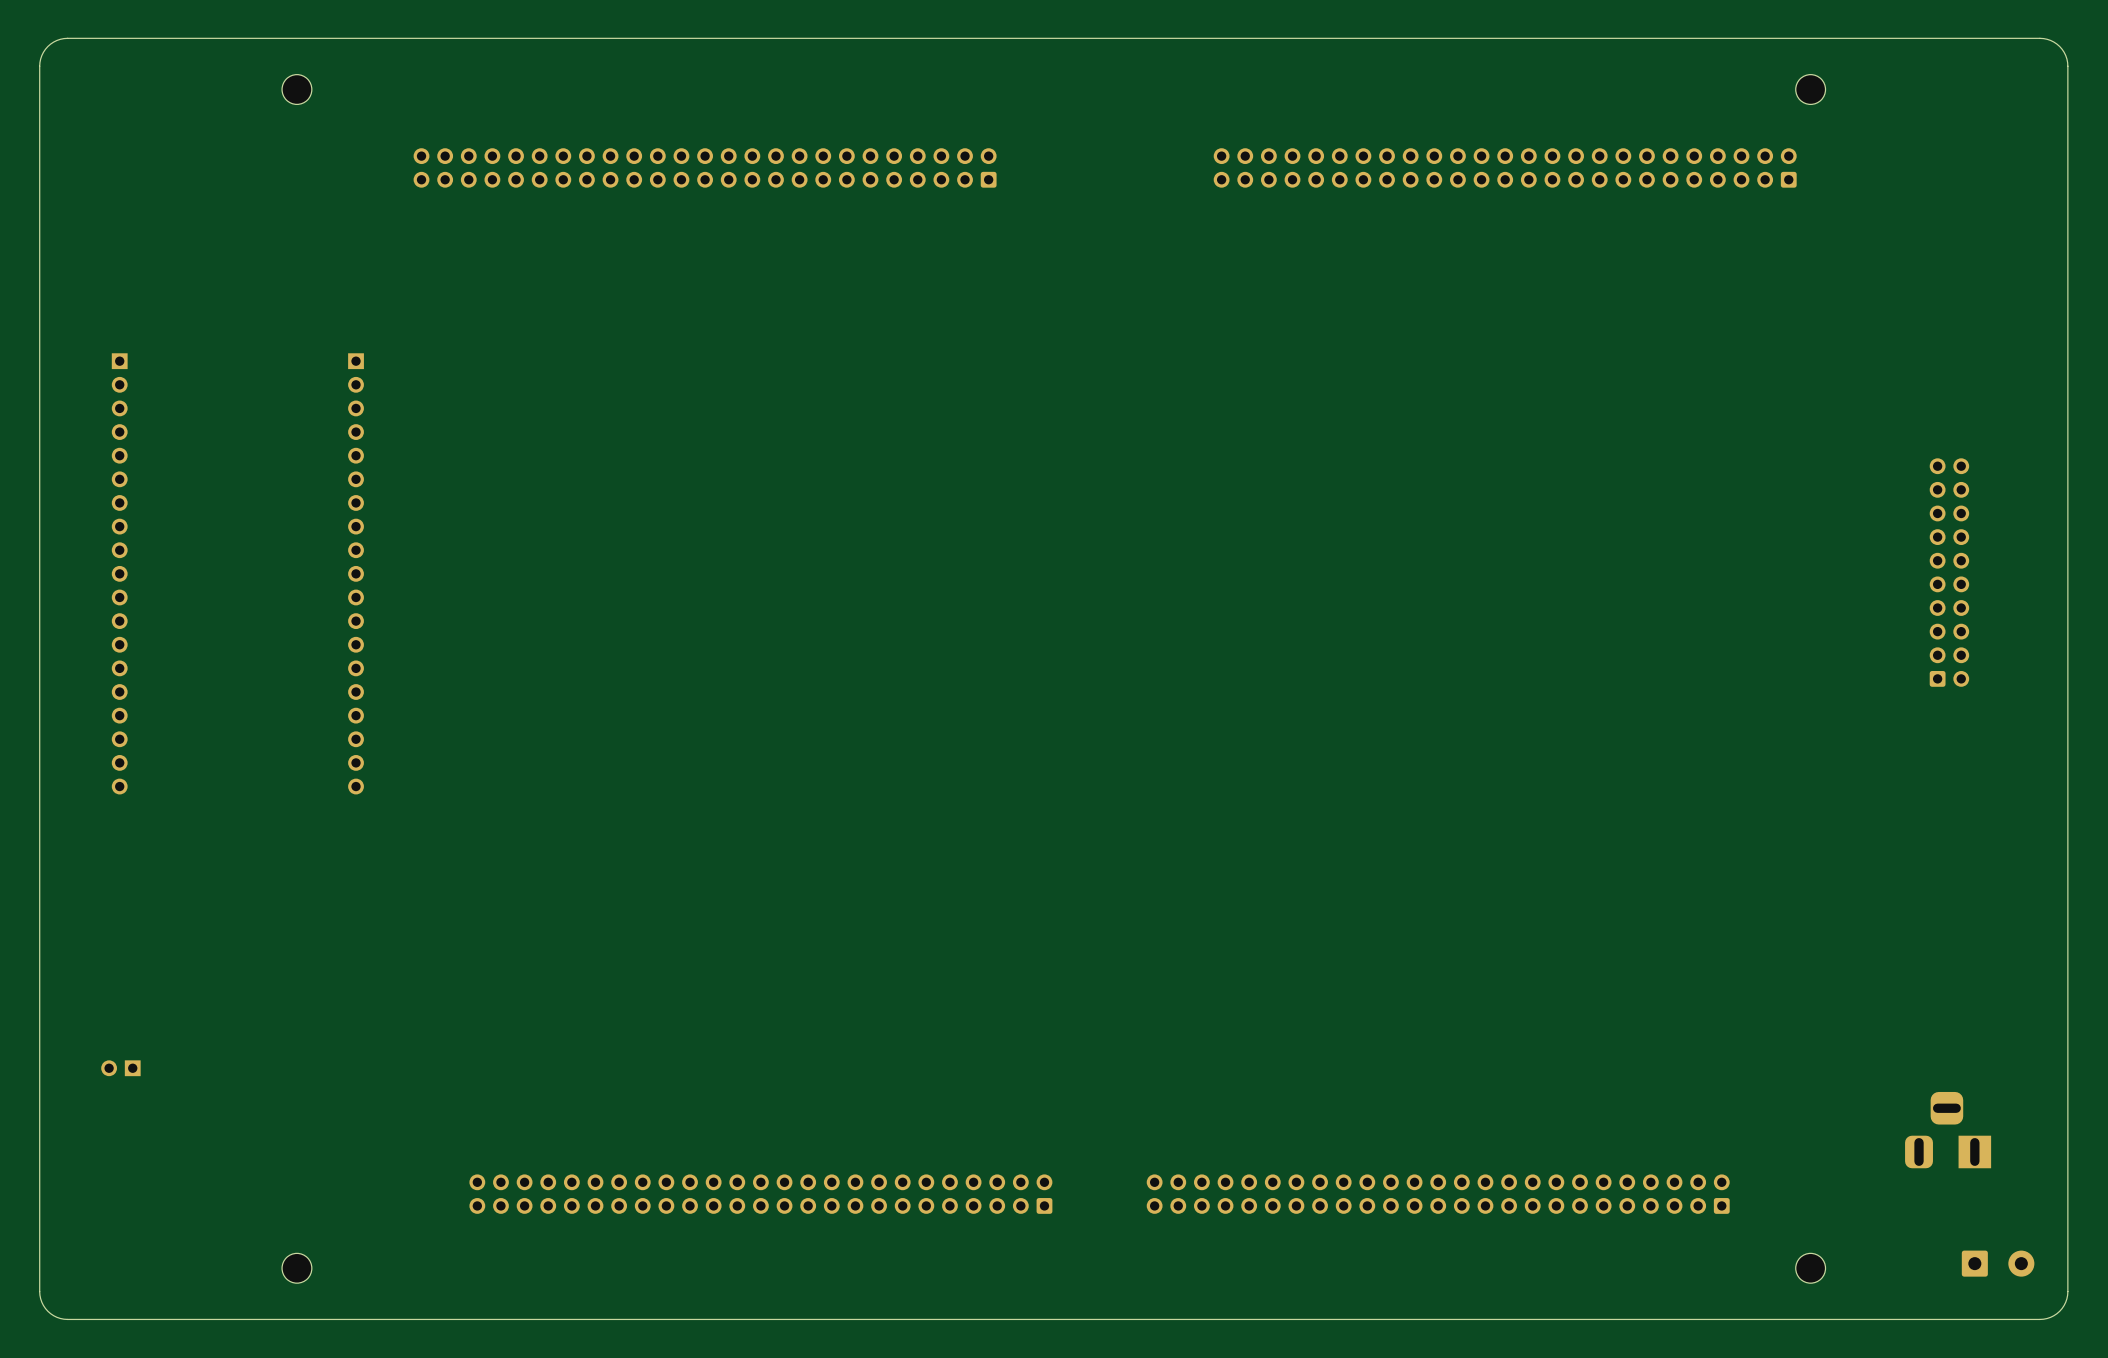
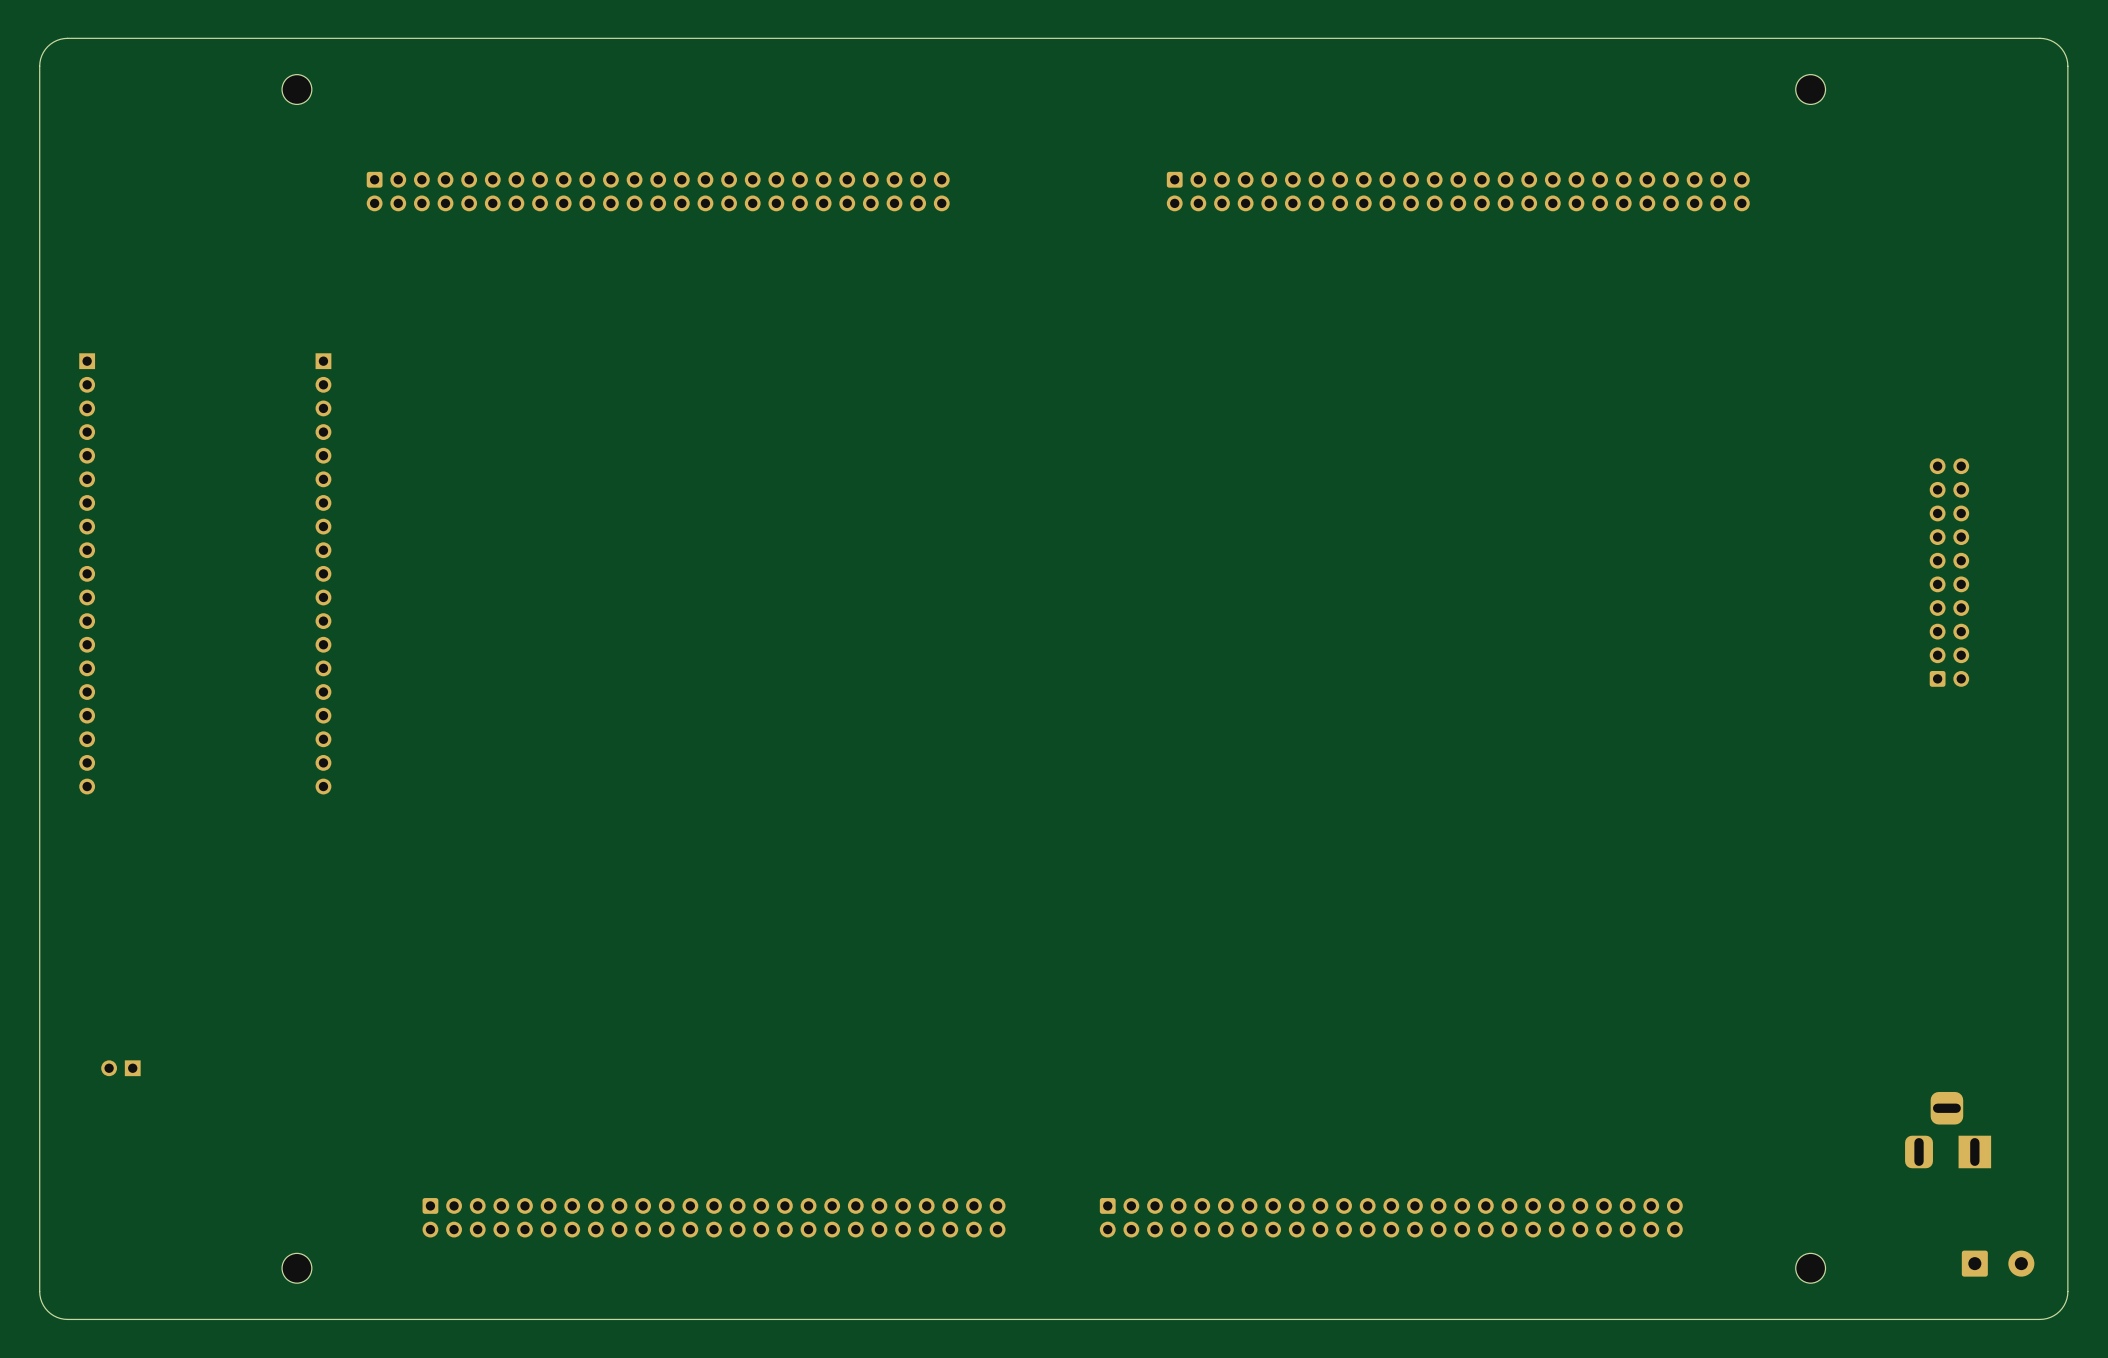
part rotation: 0° (705, 167) -> 180° (658, 191)
part rotation: 0° (1505, 167) -> 180° (1458, 191)
part position: (119, 573) -> (87, 573)
part position: (356, 573) -> (323, 573)
part rotation: 0° (760, 1194) -> 180° (714, 1217)
part rotation: 0° (1438, 1194) -> 180° (1391, 1217)

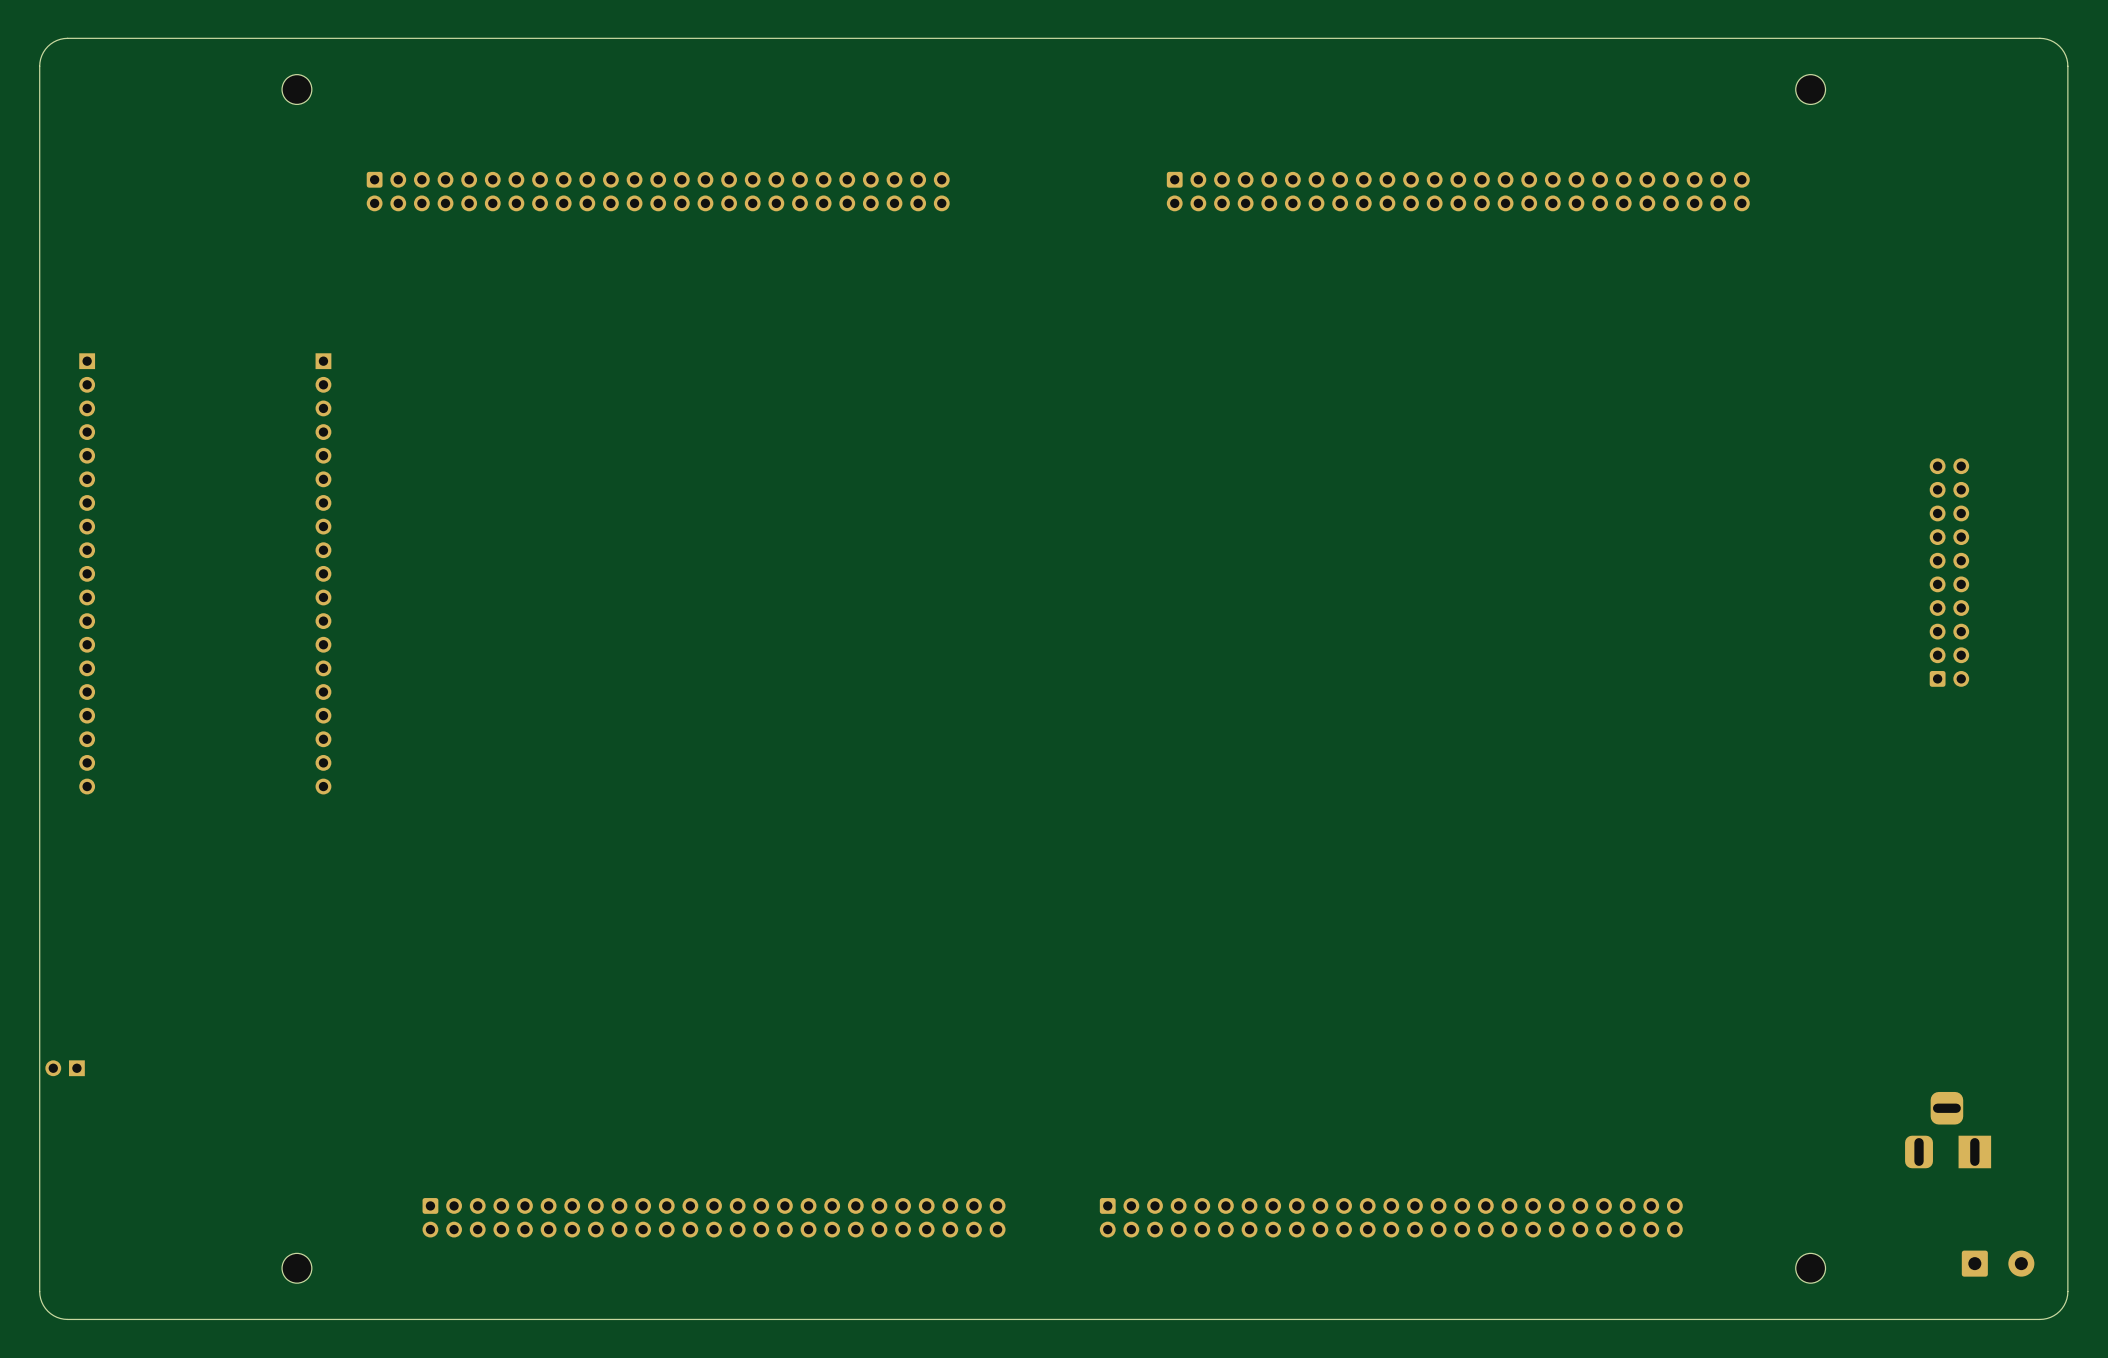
part position: (120, 1068) -> (65, 1068)

